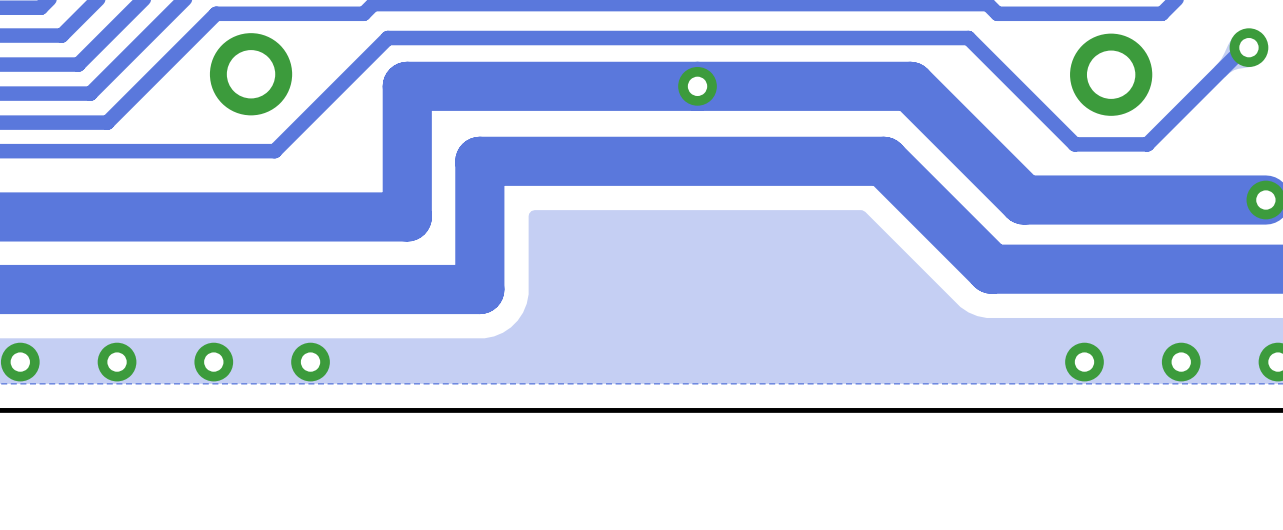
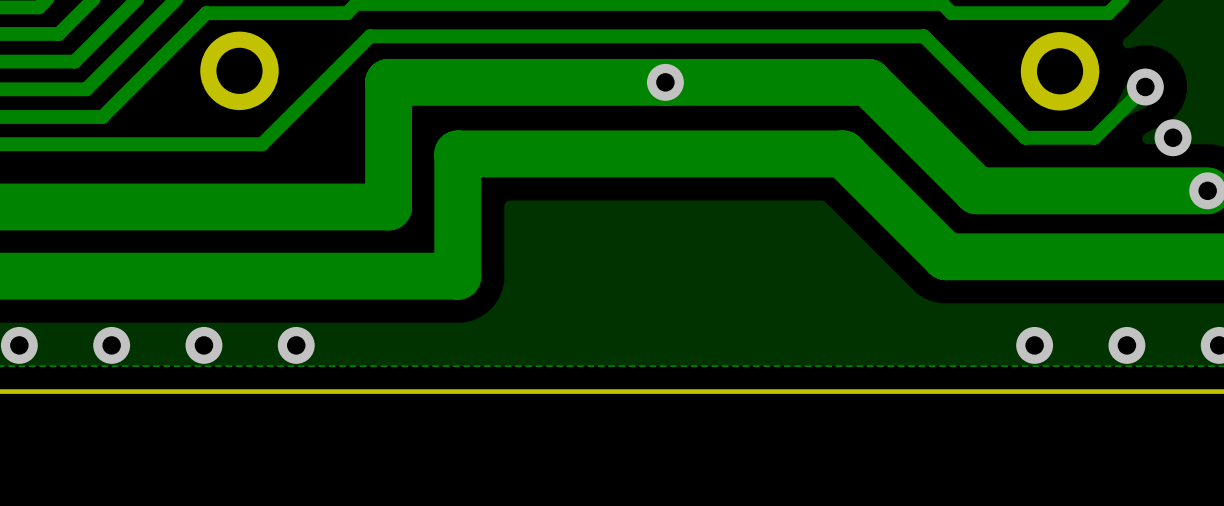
track: (1248, 47) (1244, 47) (1200, 91) -> none
via: (1248, 47) -> none
via: none -> (1145, 86)
via: none -> (1173, 137)

